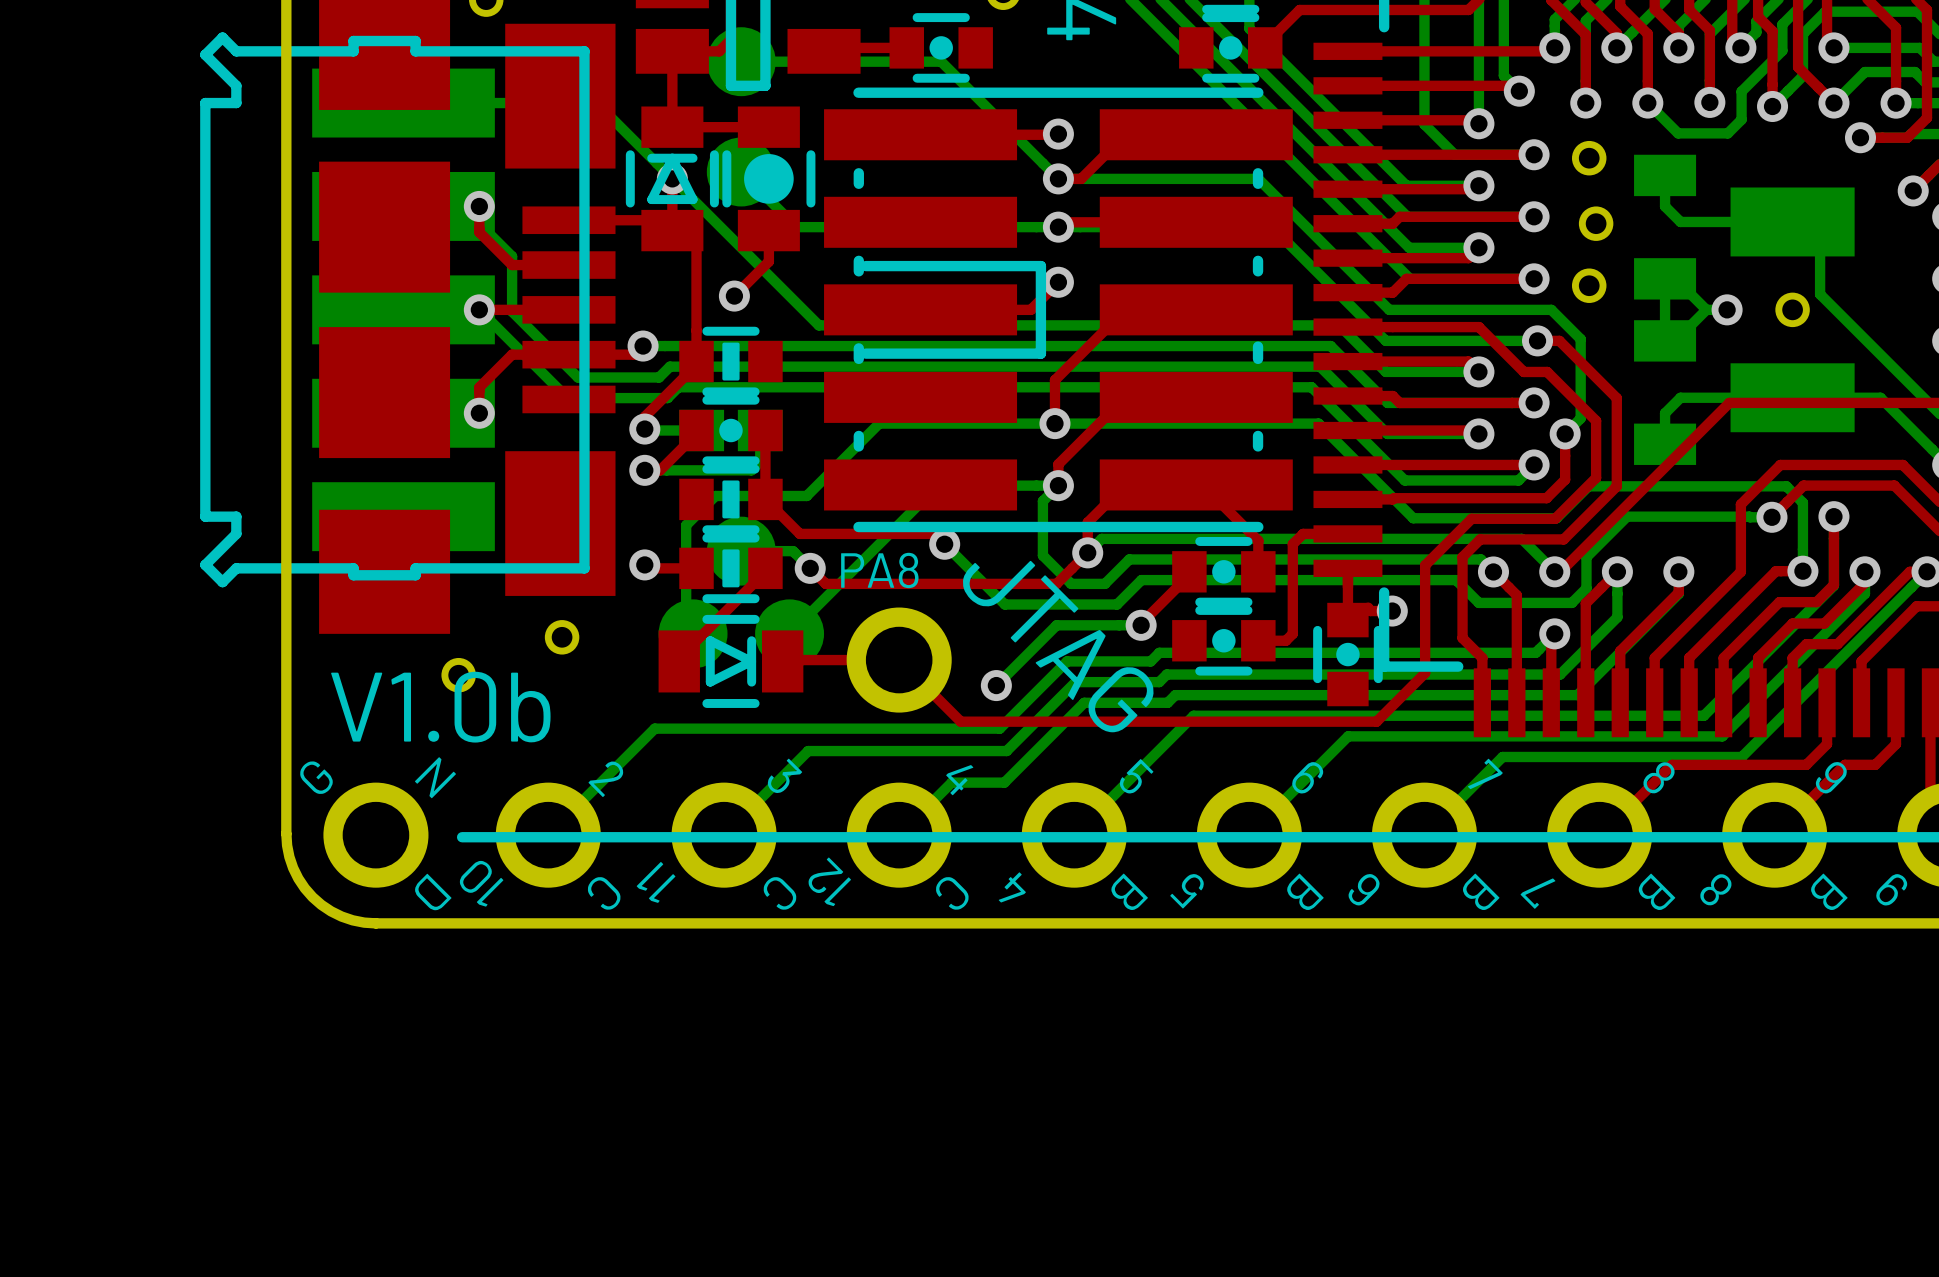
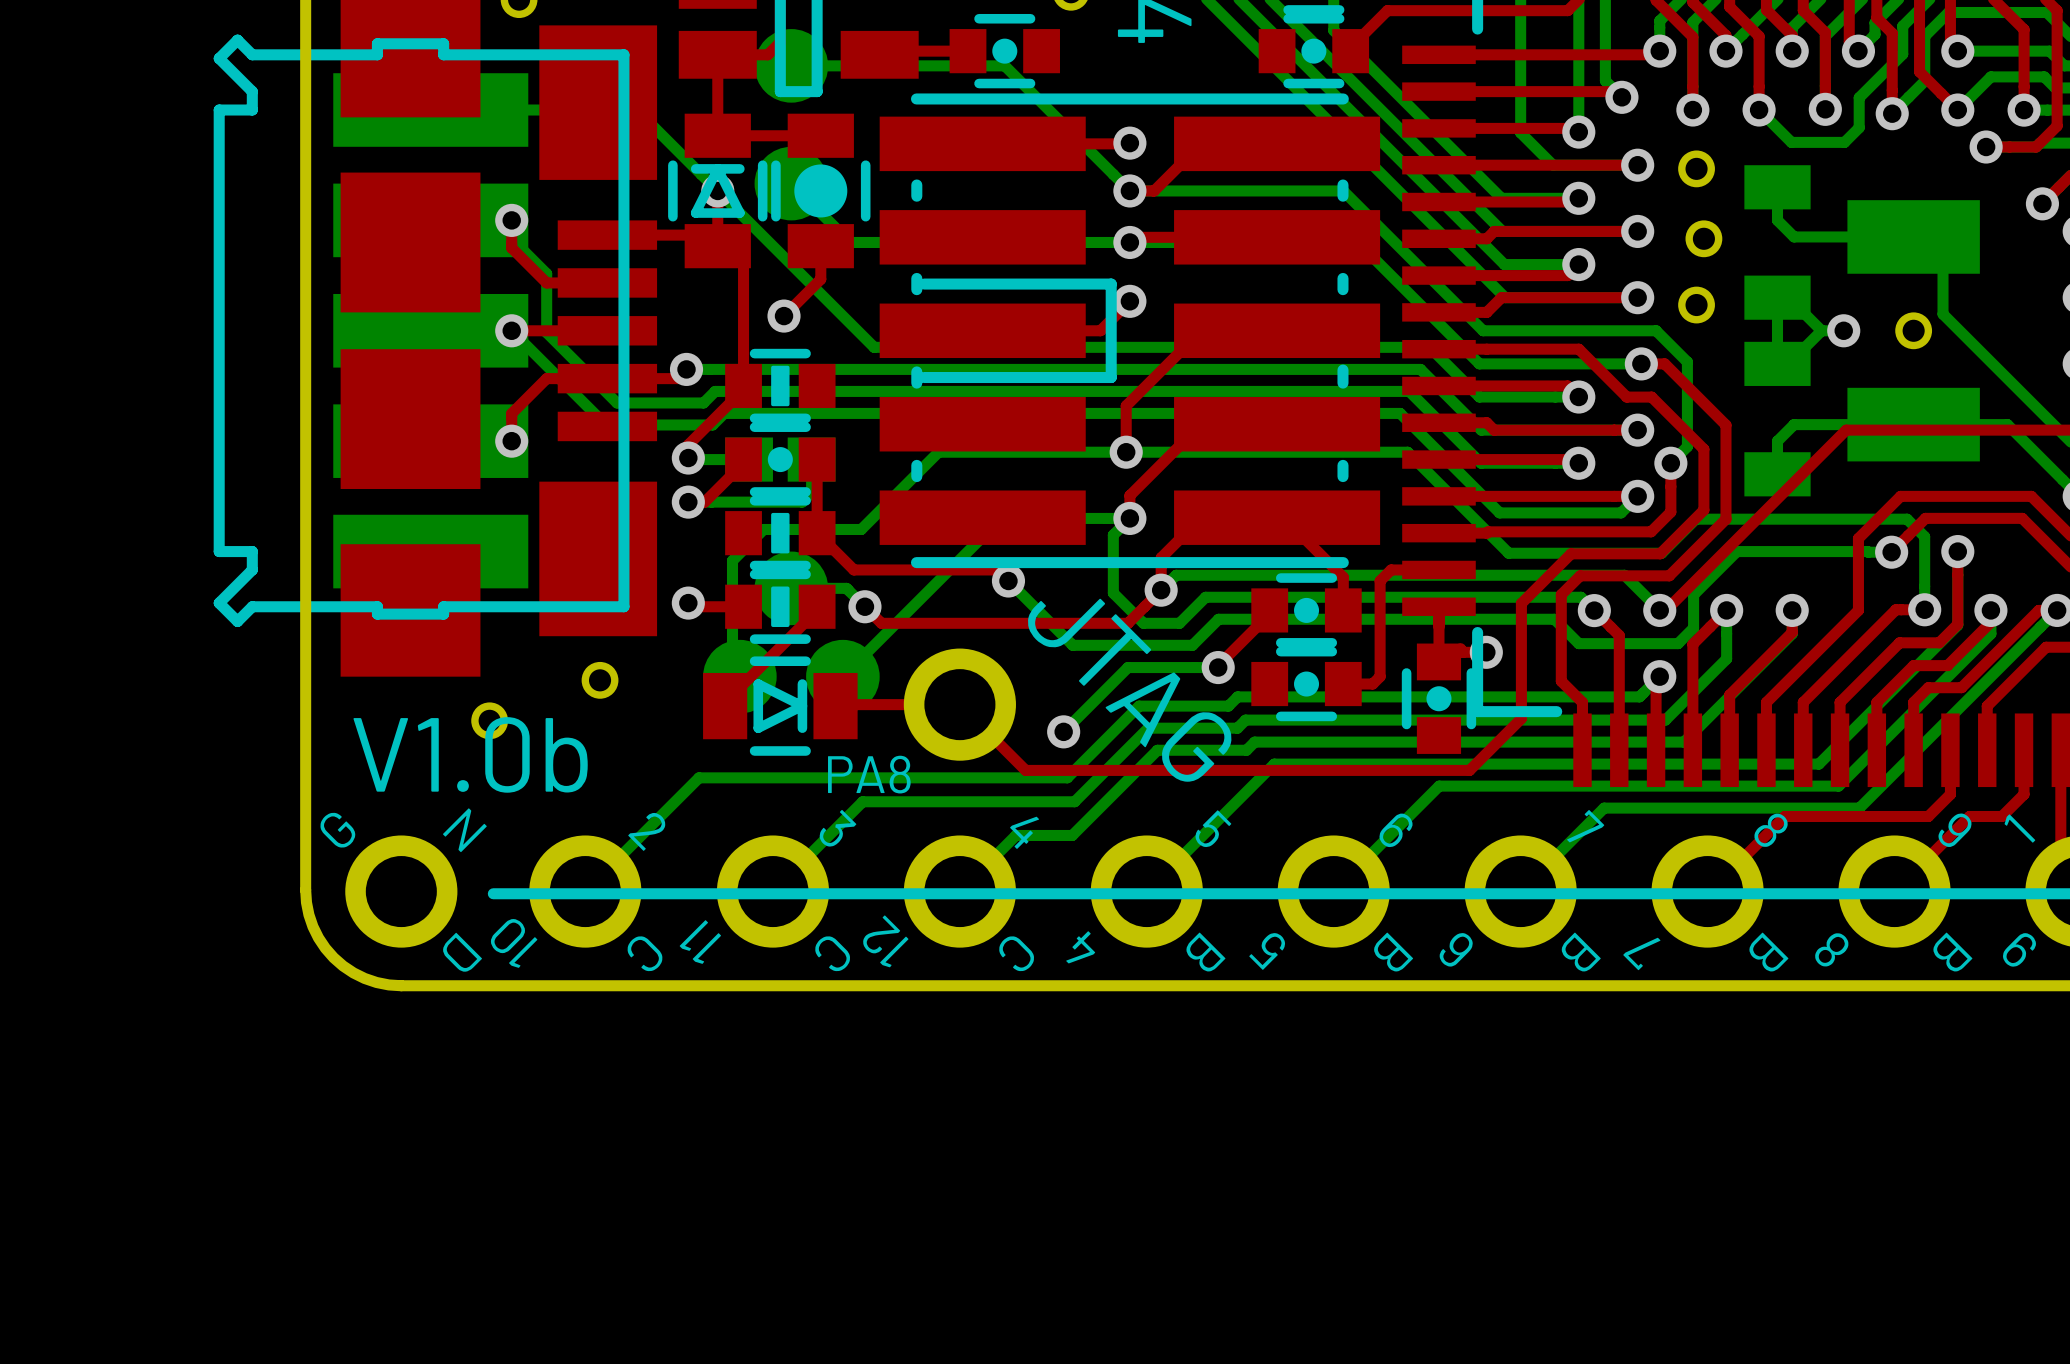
text position: PA8 (879, 570) -> PA8 (869, 774)
text: none -> 1 (2020, 828)

